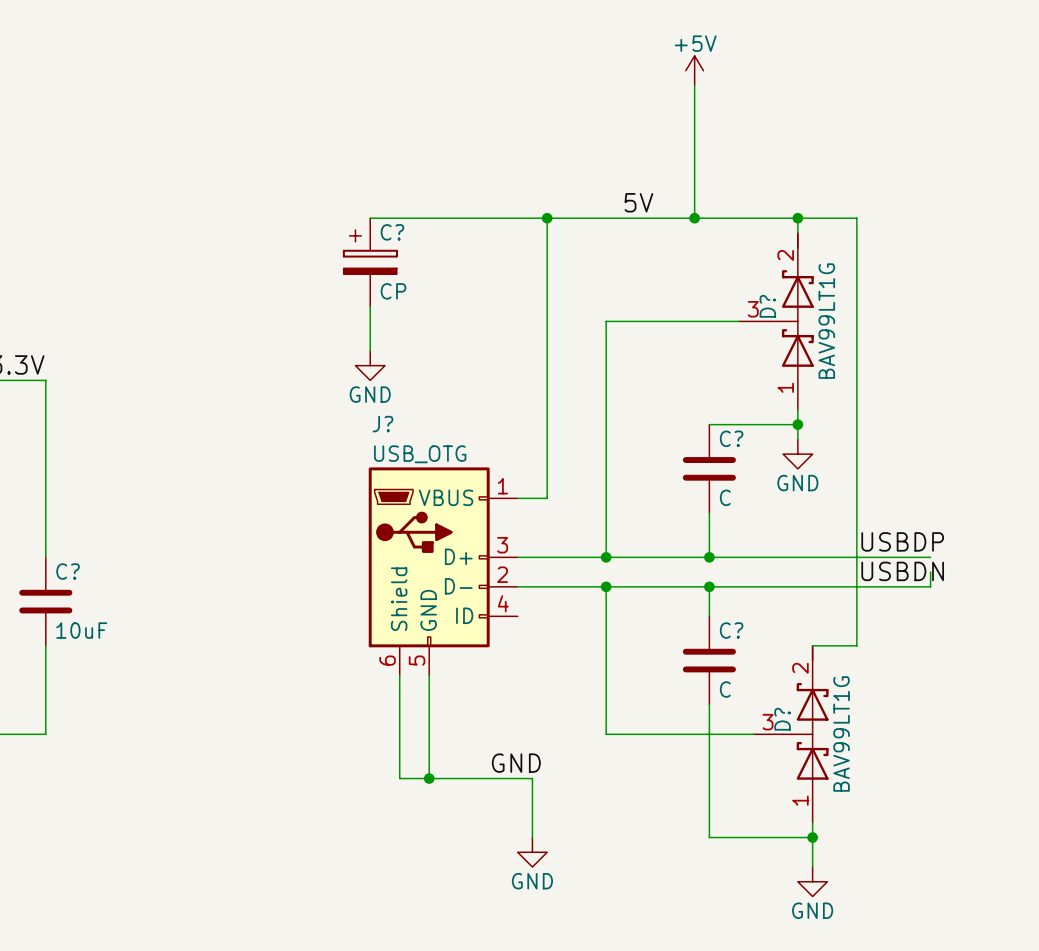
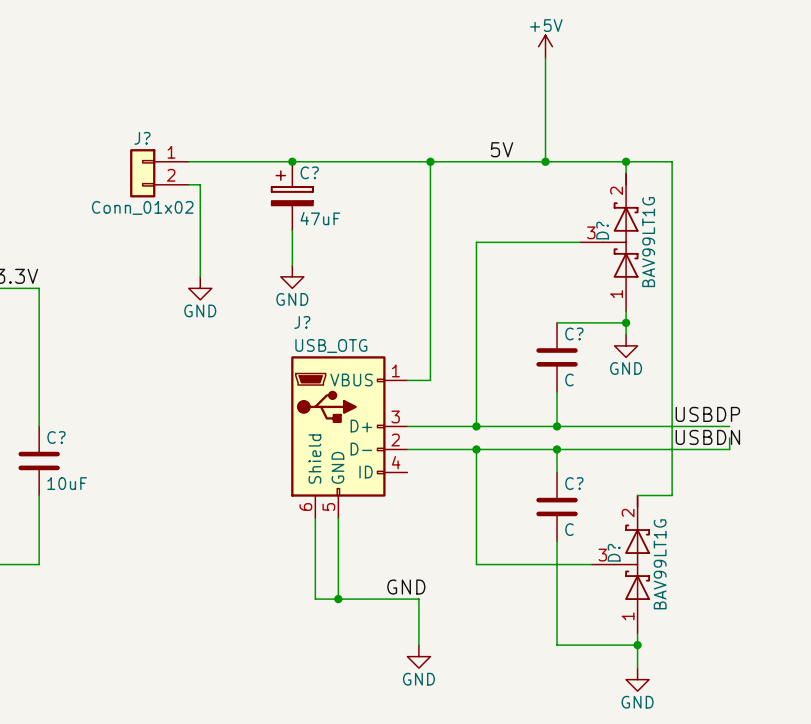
wire: none -> (188, 161) (292, 161)
junction: none -> (292, 161)
J?: none -> Conn_01x02 (159, 173)
wire: none -> (188, 184) (200, 184) (200, 276)
C? value: CP (393, 291) -> 47uF (320, 218)
power symbol: none -> GND (200, 288)

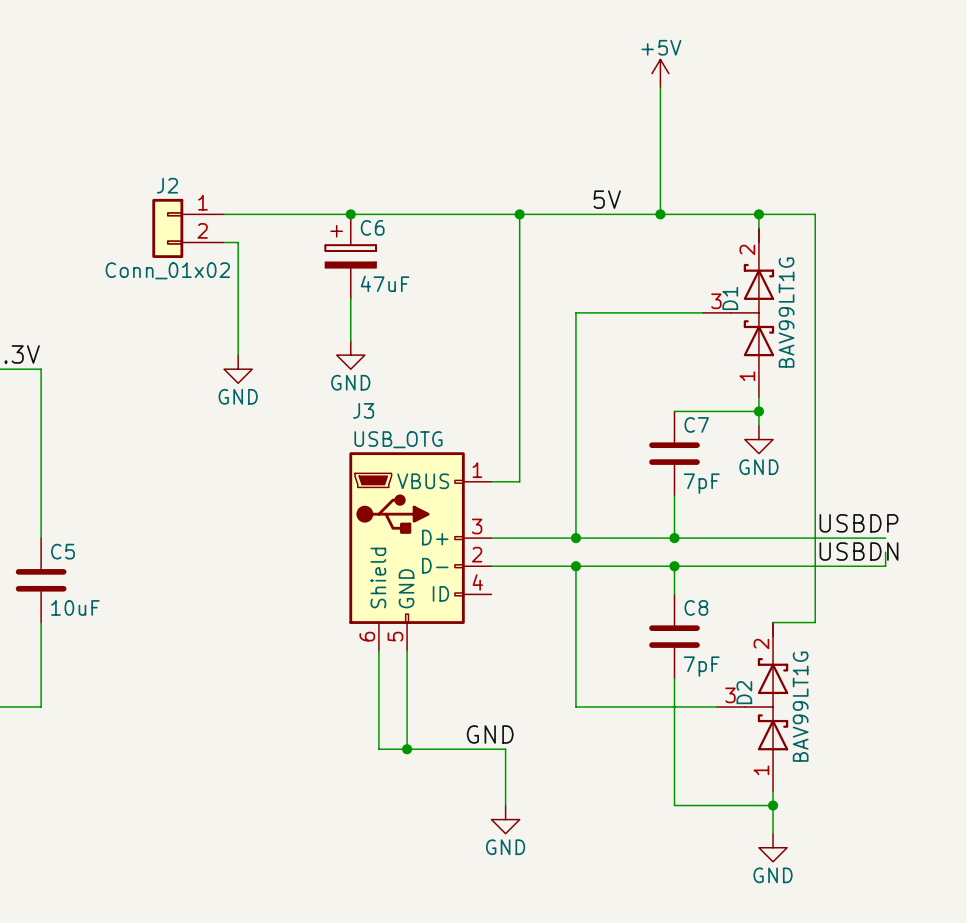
J? name: J? (142, 138) -> J2 (167, 185)
C? name: C? (309, 172) -> C6 (372, 227)
D? name: D? (602, 230) -> D1 (730, 298)
J? name: J? (302, 322) -> J3 (363, 410)
C? name: C? (574, 333) -> C7 (696, 424)
C? value: C (569, 380) -> 7pF (701, 483)
C? name: C? (56, 437) -> C5 (63, 551)
C? name: C? (574, 483) -> C8 (696, 607)
C? value: C (569, 529) -> 7pF (701, 666)
D? name: D? (614, 552) -> D2 (744, 692)

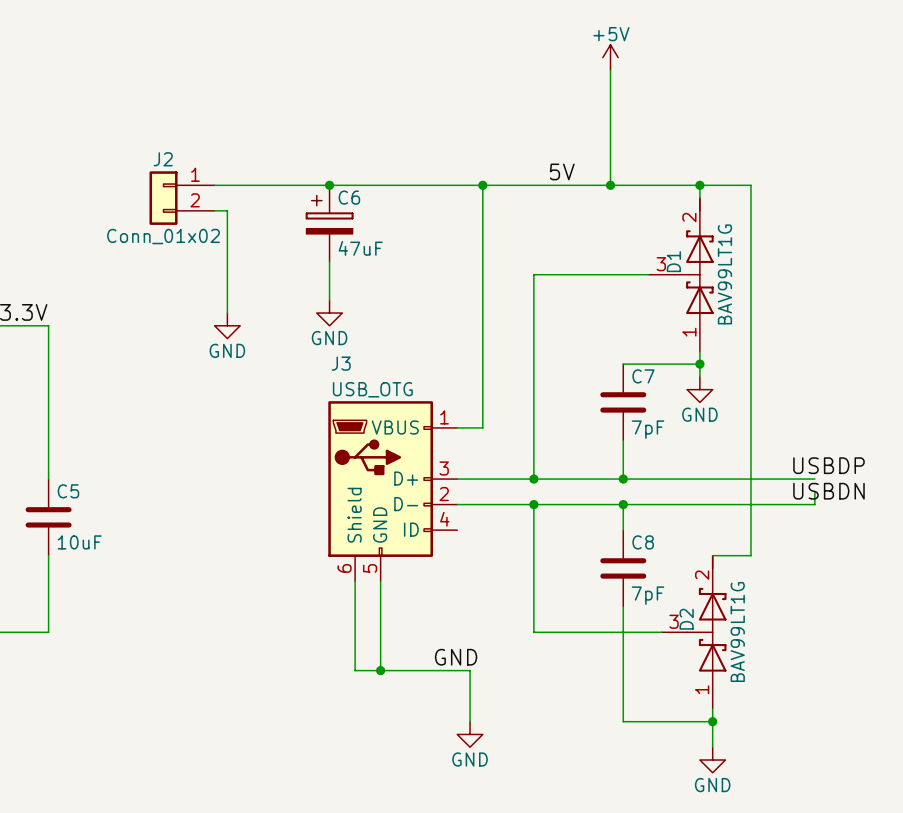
label position: USBDP (858, 523) -> USBDP (828, 465)
label position: USBDN (858, 551) -> USBDN (828, 491)

